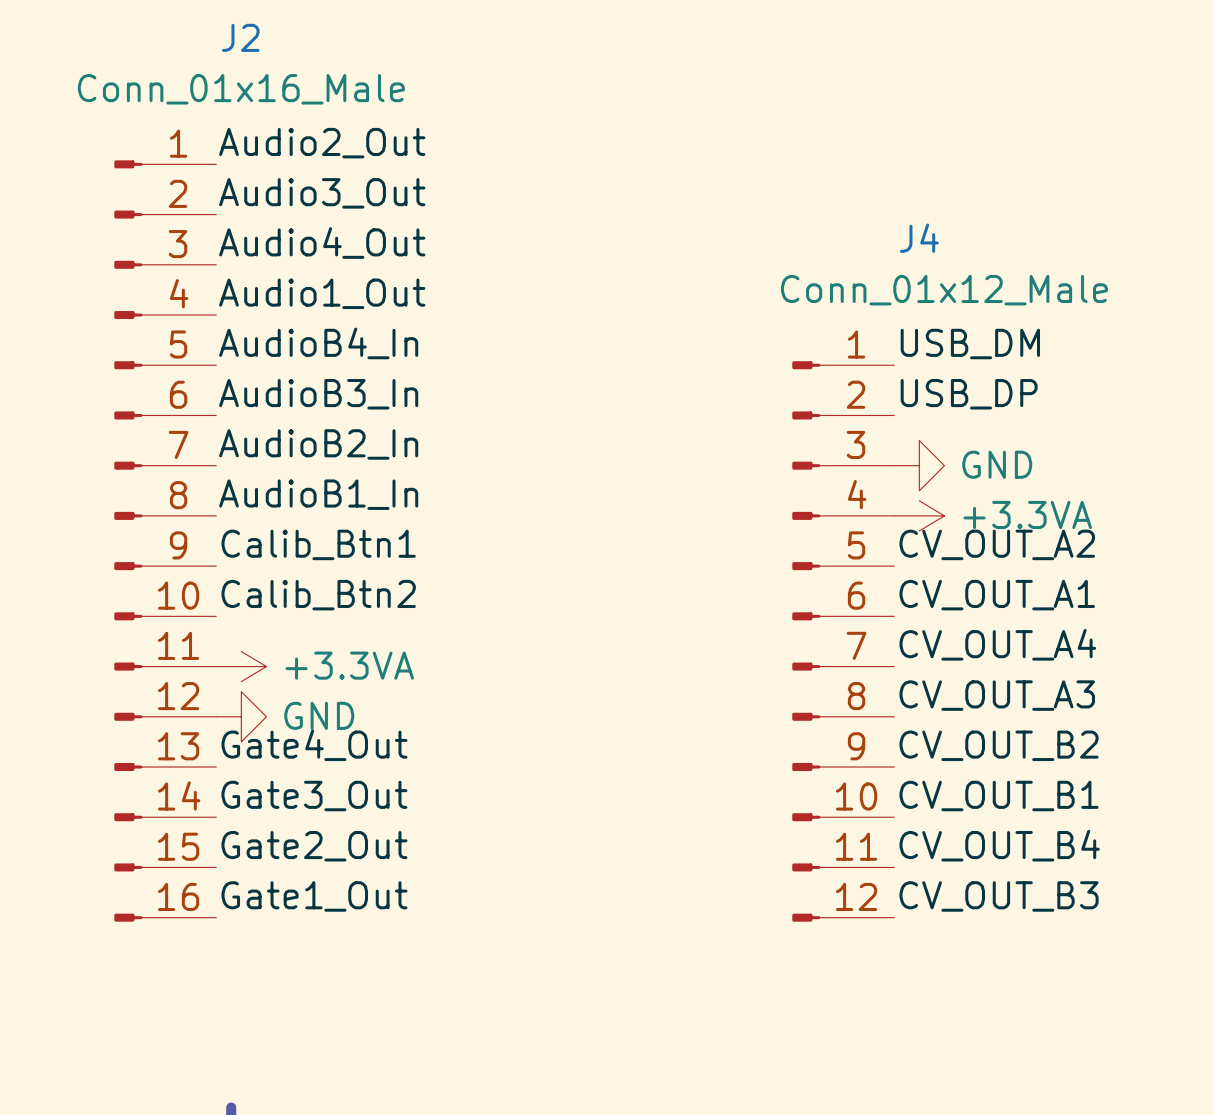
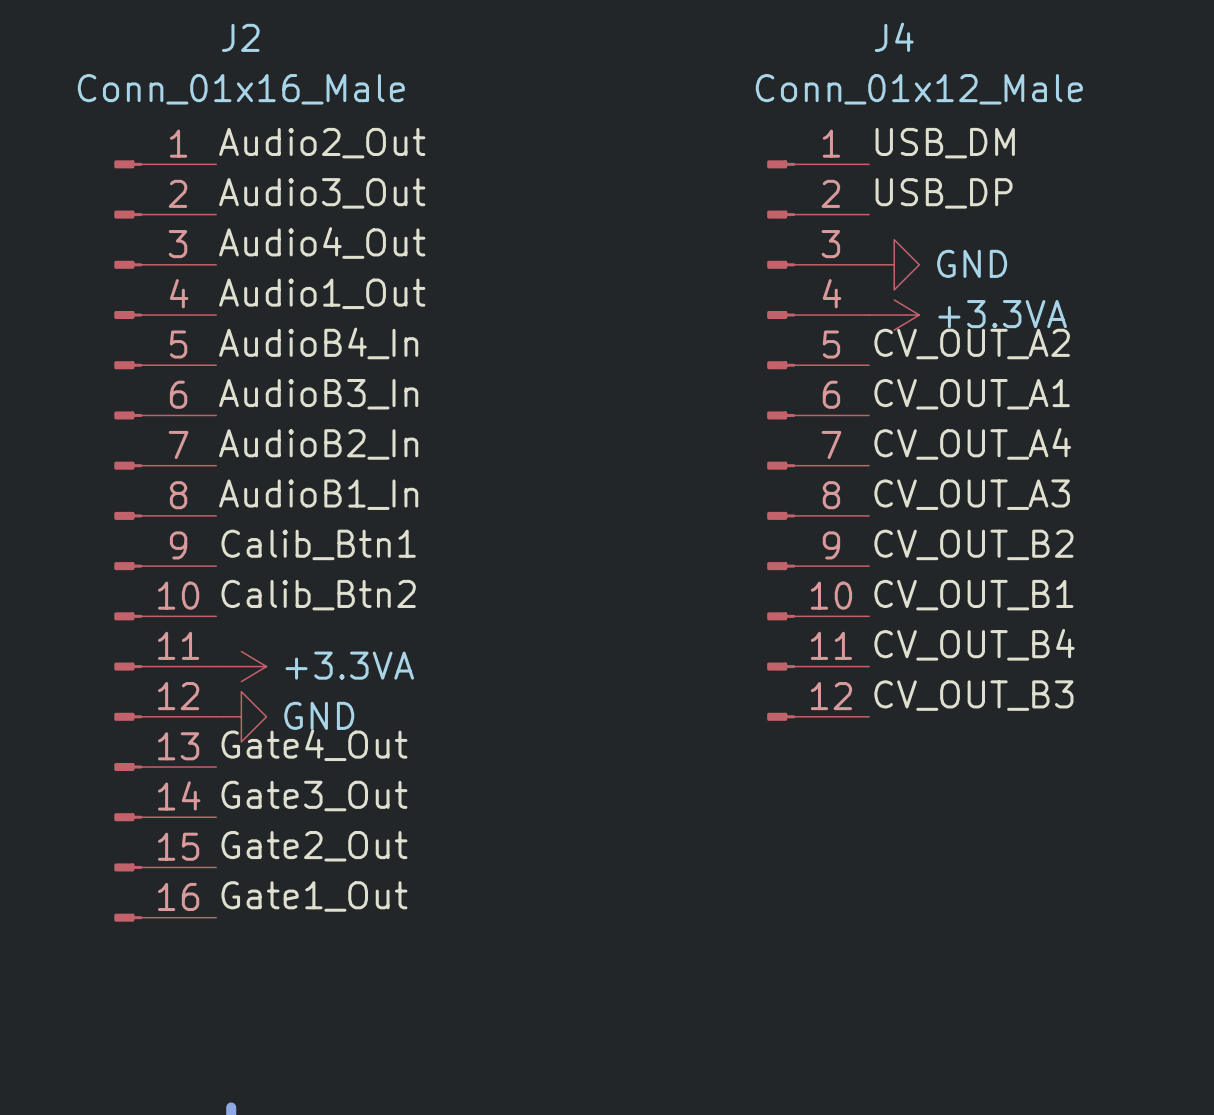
label position: USB_DM (970, 344) -> USB_DM (945, 143)
label position: USB_DP (969, 394) -> USB_DP (944, 193)
power symbol position: GND (919, 465) -> GND (894, 264)
power symbol position: +3.3VA (919, 515) -> +3.3VA (894, 315)
label position: CV_OUT_A2 (997, 544) -> CV_OUT_A2 (972, 344)
label position: CV_OUT_A1 (997, 595) -> CV_OUT_A1 (972, 394)
J4 position: (843, 641) -> (818, 440)
label position: CV_OUT_A4 (997, 644) -> CV_OUT_A4 (972, 443)
label position: CV_OUT_A3 (997, 695) -> CV_OUT_A3 (972, 494)
label position: CV_OUT_B2 (999, 745) -> CV_OUT_B2 (973, 544)
label position: CV_OUT_B1 (999, 796) -> CV_OUT_B1 (973, 595)
label position: CV_OUT_B4 (999, 845) -> CV_OUT_B4 (974, 644)
label position: CV_OUT_B3 (999, 896) -> CV_OUT_B3 (973, 695)

